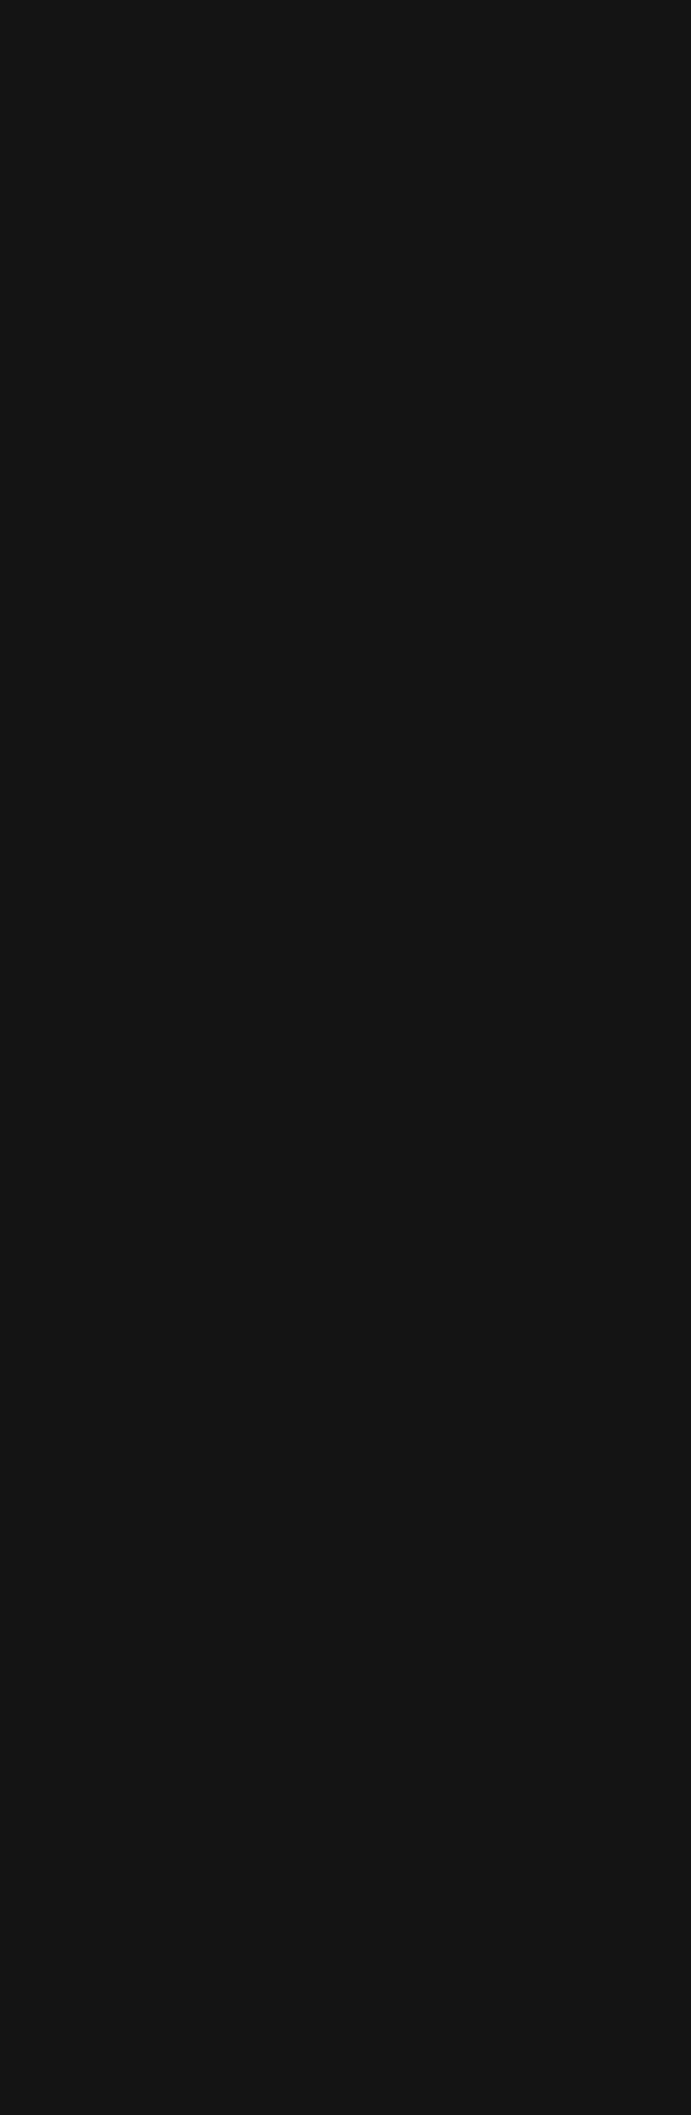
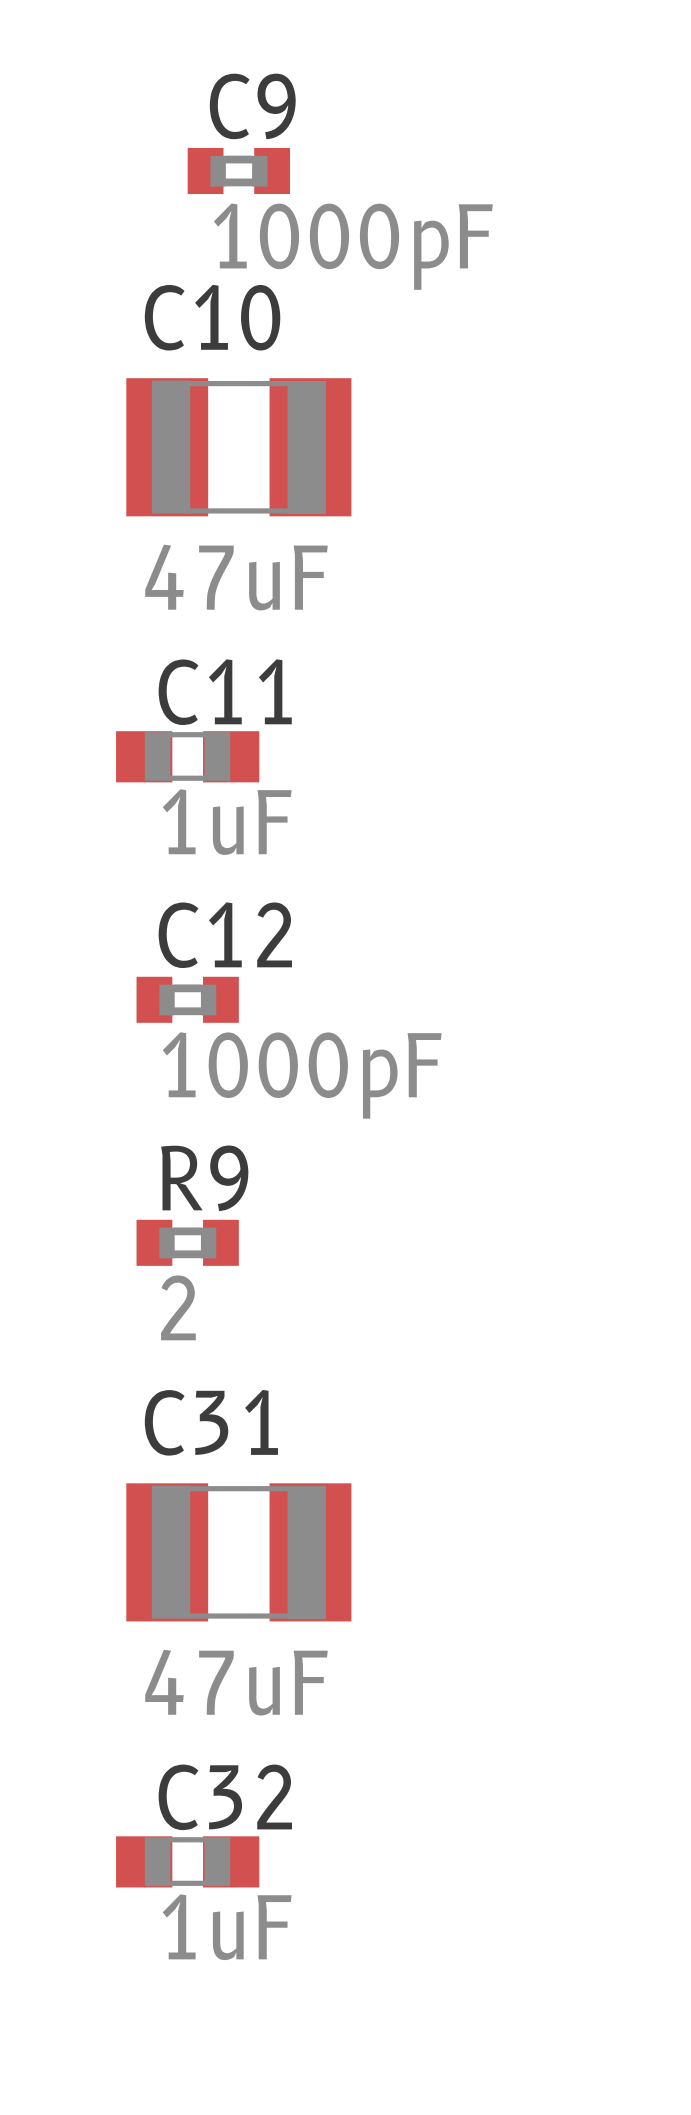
C9: none -> 1000pF (238, 170)
C10: none -> 47uF (238, 447)
C11: none -> 1uF (187, 756)
C12: none -> 1000pF (187, 999)
R9: none -> 2 (187, 1242)
C31: none -> 47uF (238, 1552)
C32: none -> 1uF (187, 1861)

